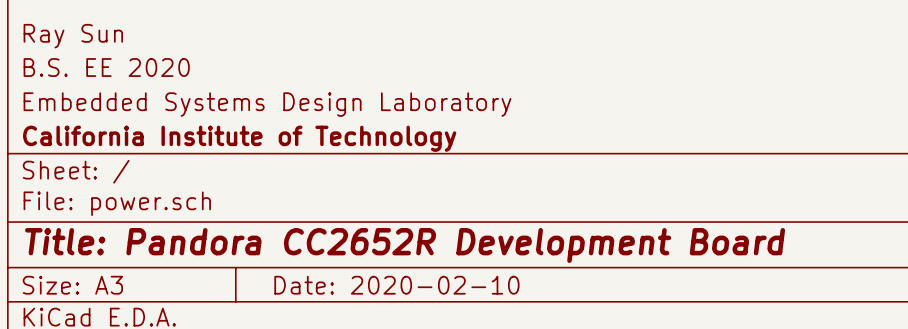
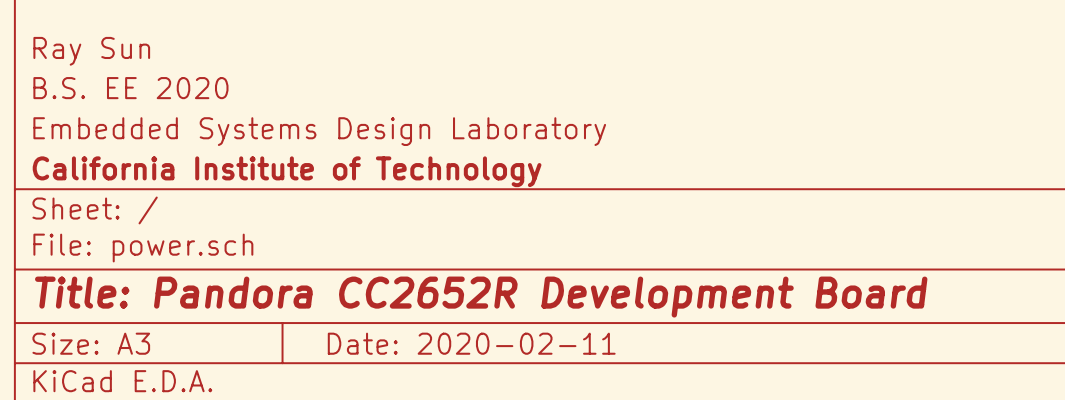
title block: Date: 2020-02-10 (396, 285) -> Date: 2020-02-11 (471, 343)

